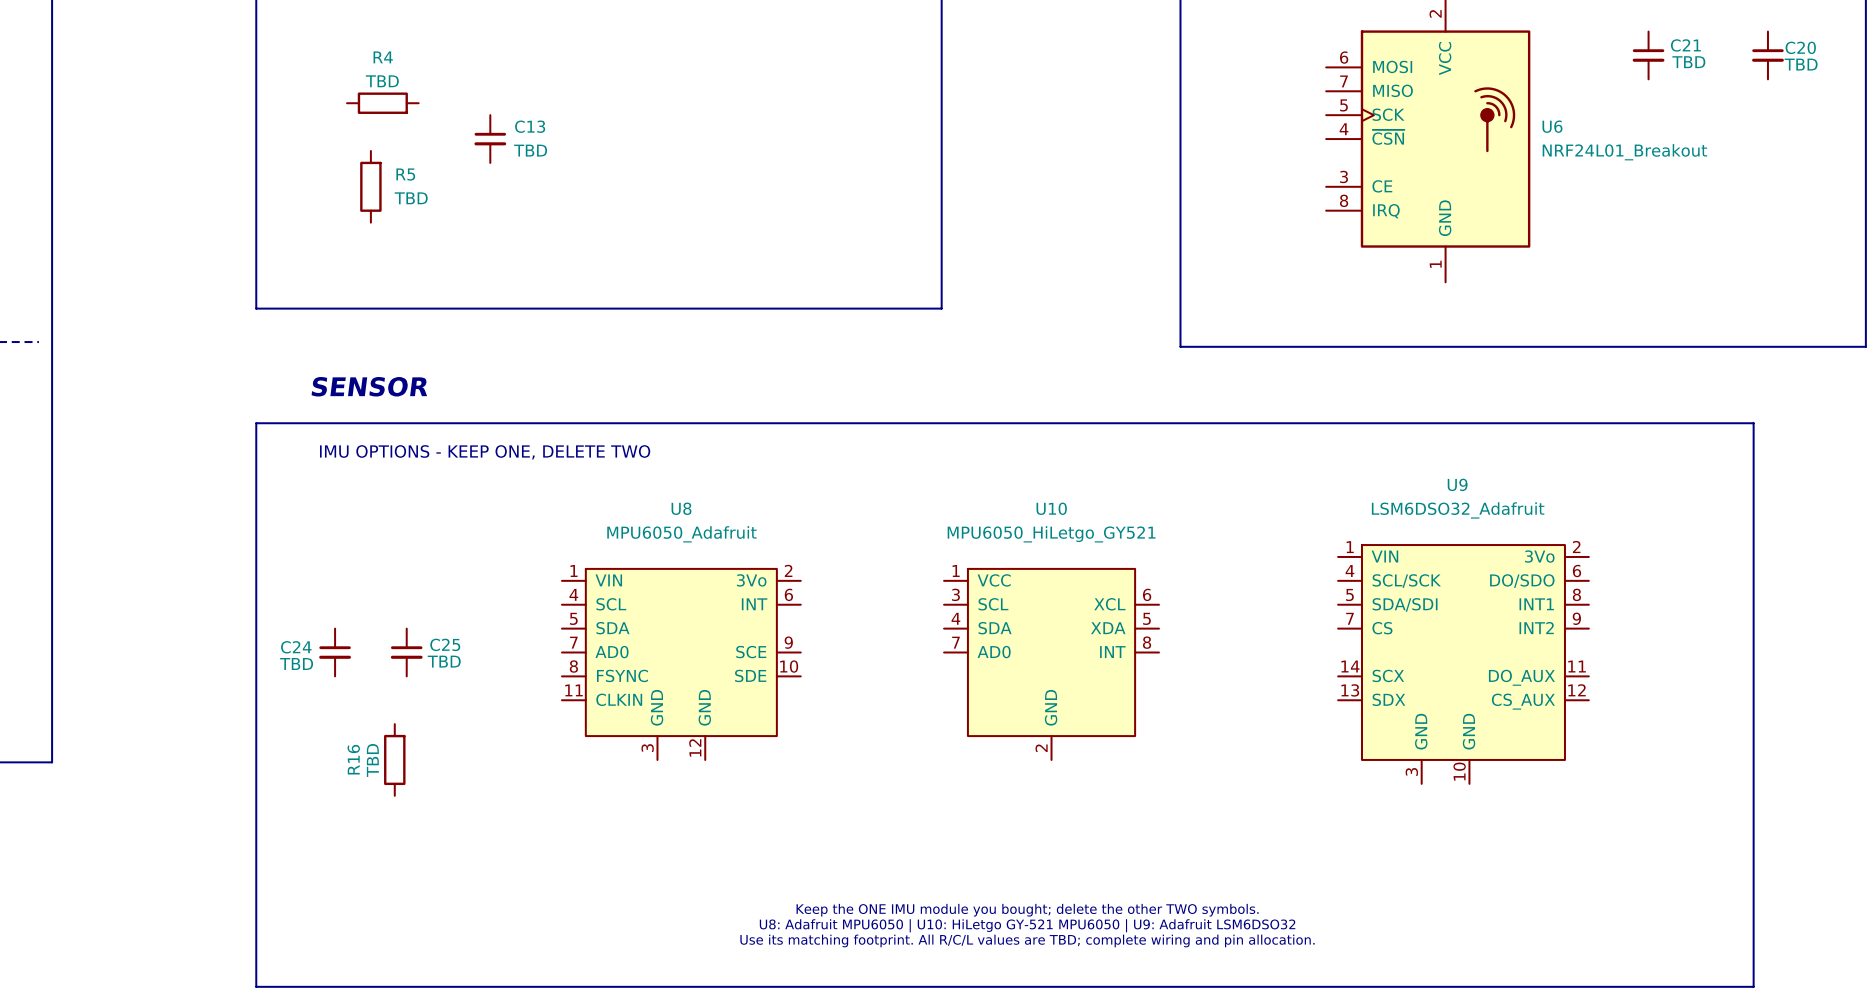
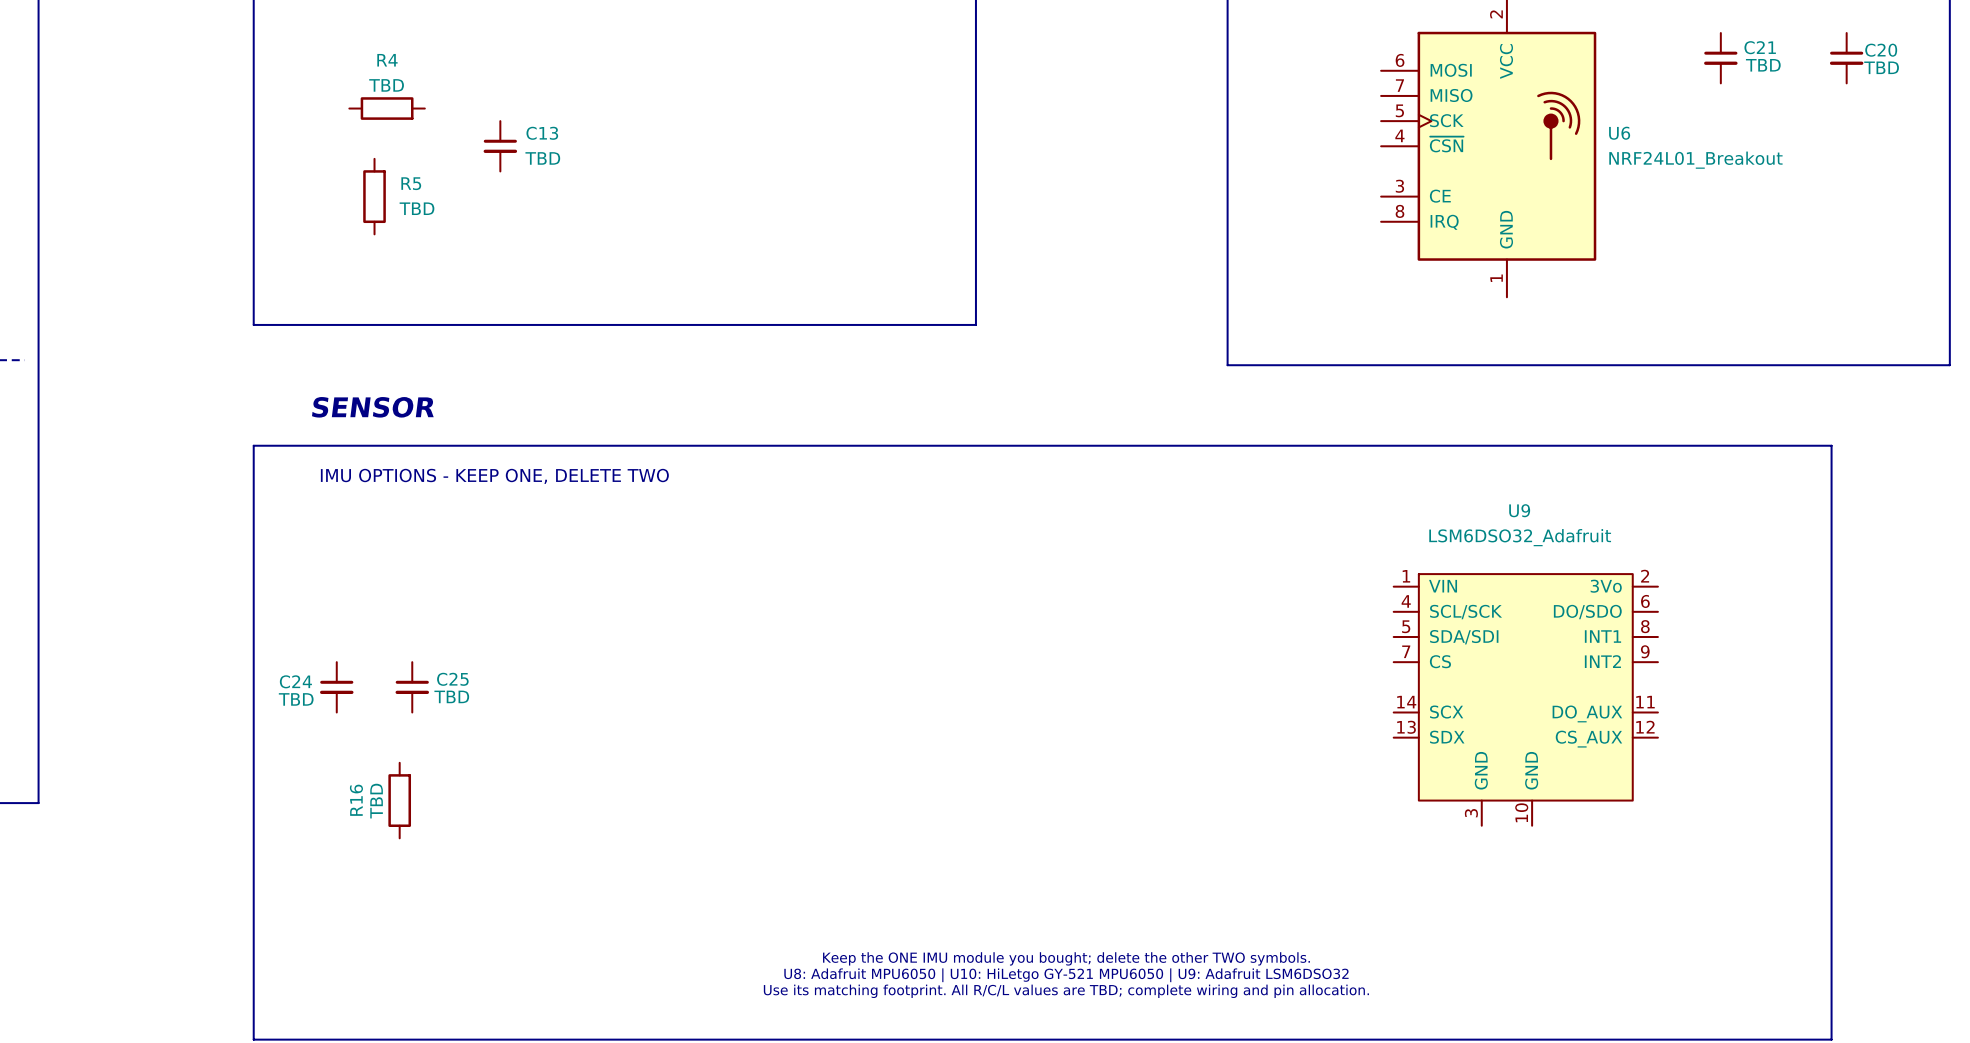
U8: MPU6050_Adafruit (681, 664) -> none
U10: MPU6050_HiLetgo_GY521 (1051, 664) -> none

